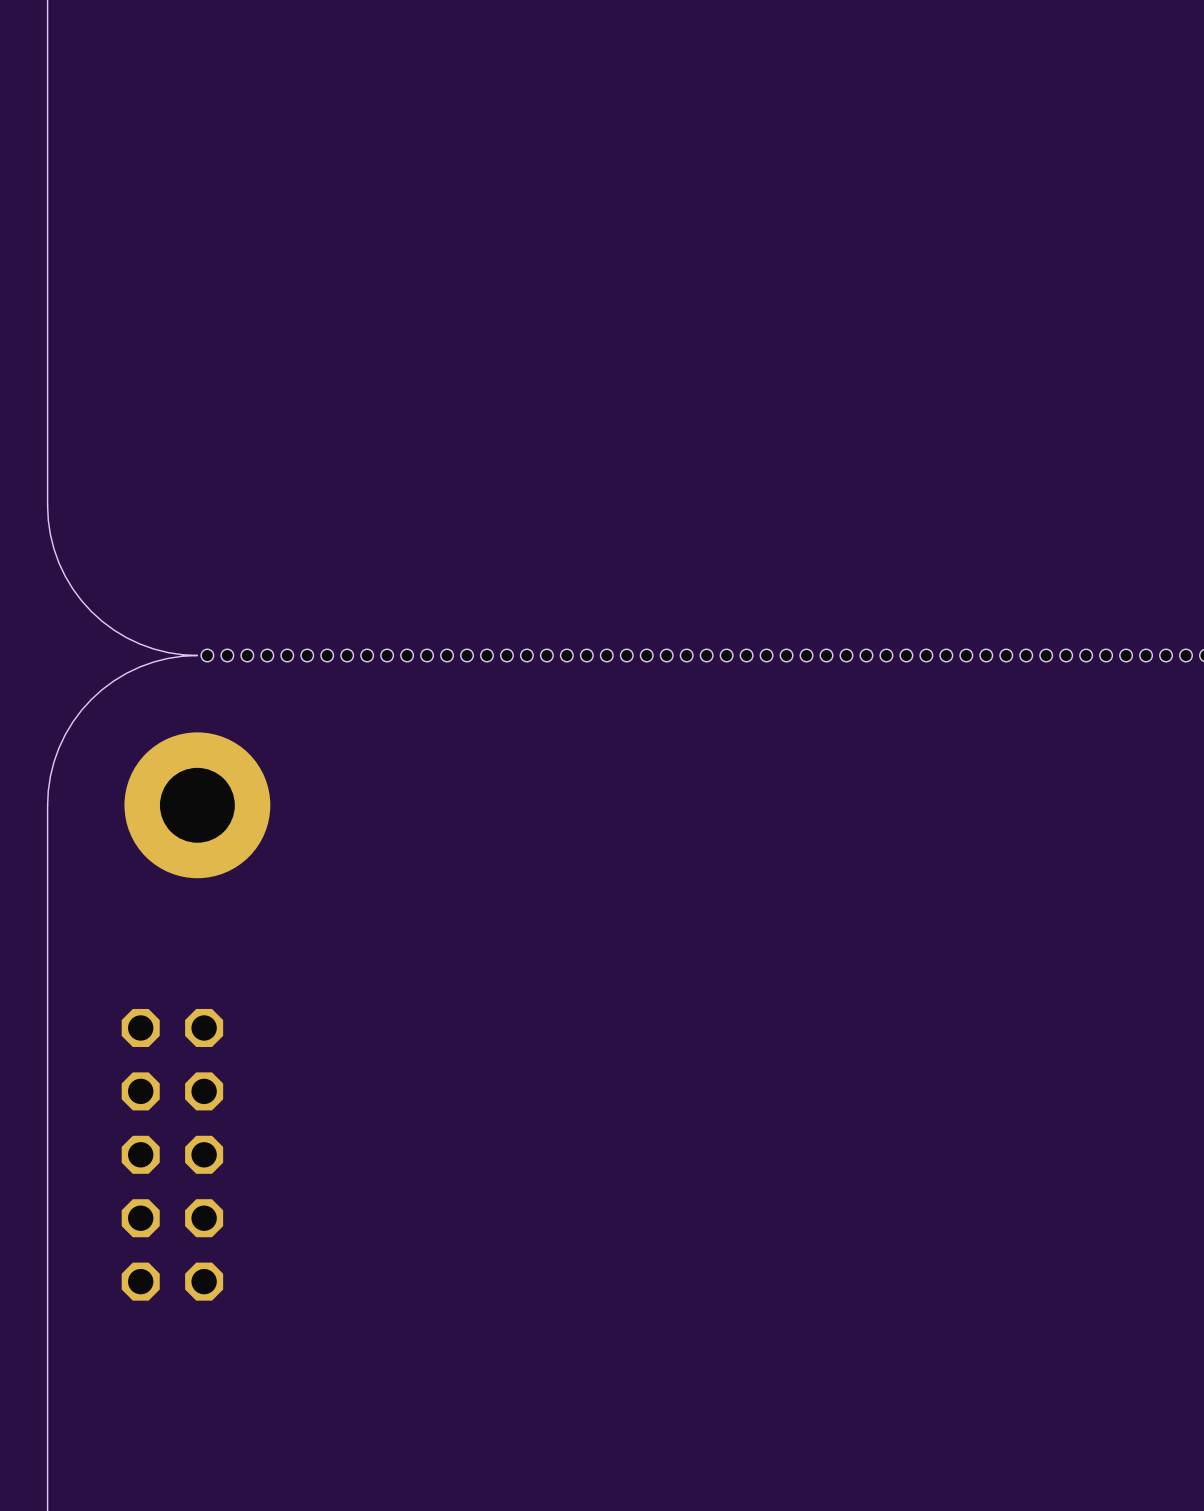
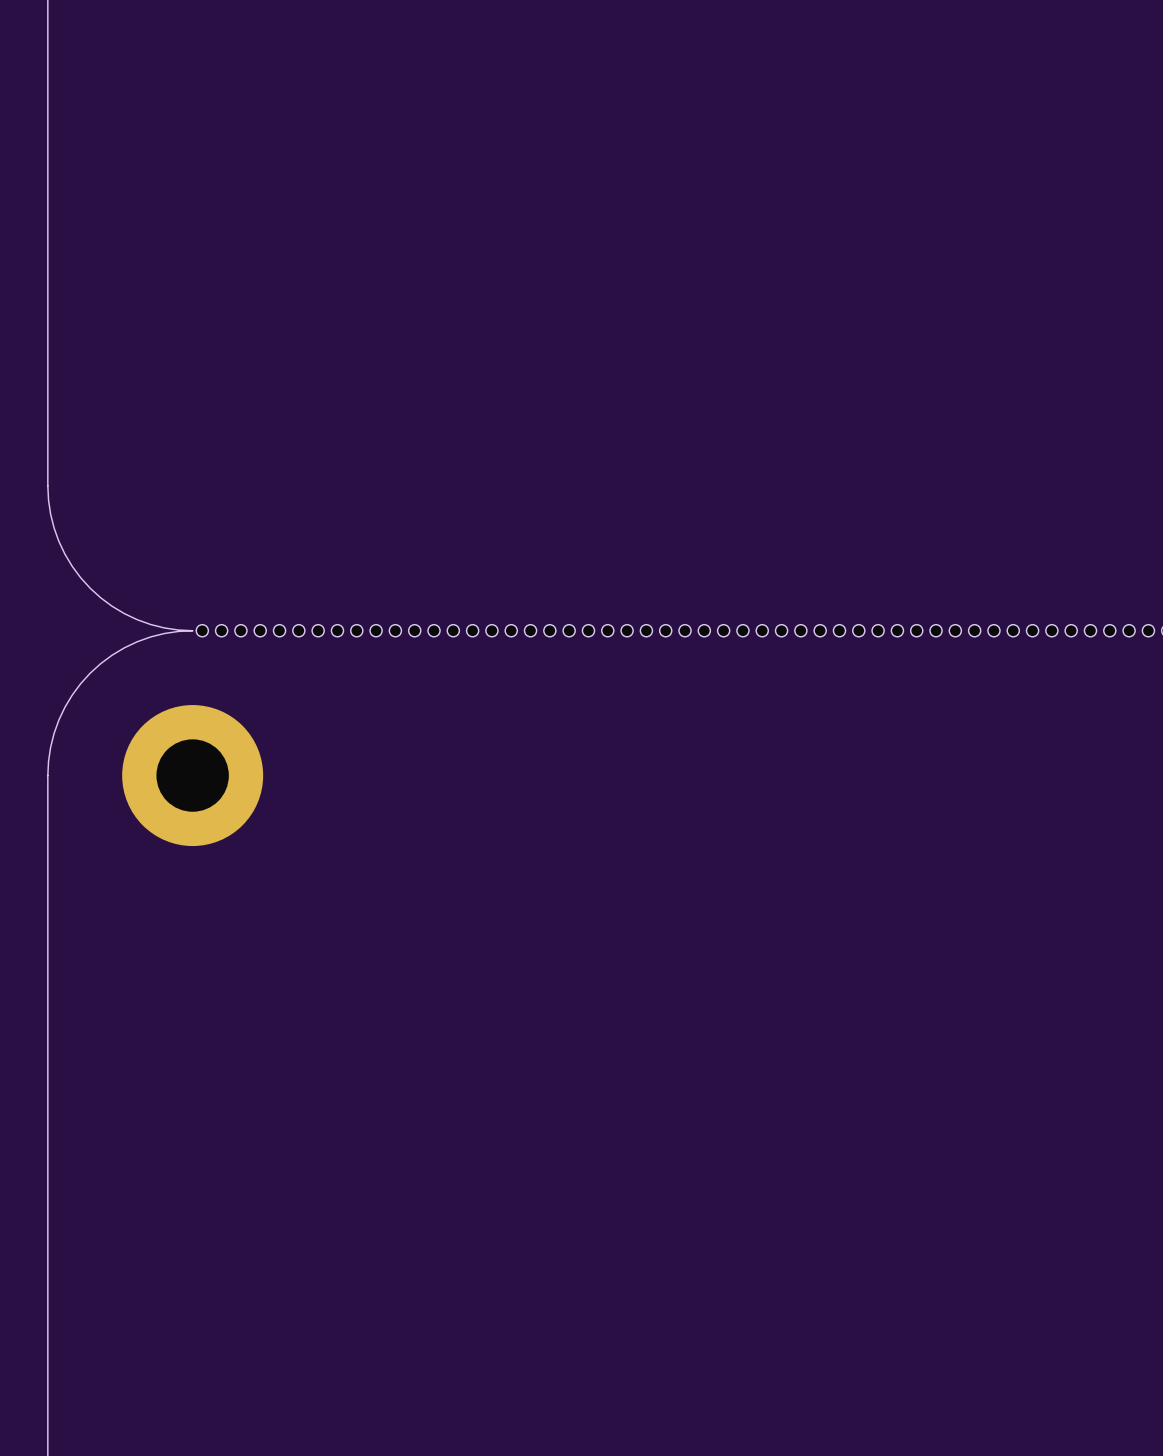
part: (172, 1154) -> none

